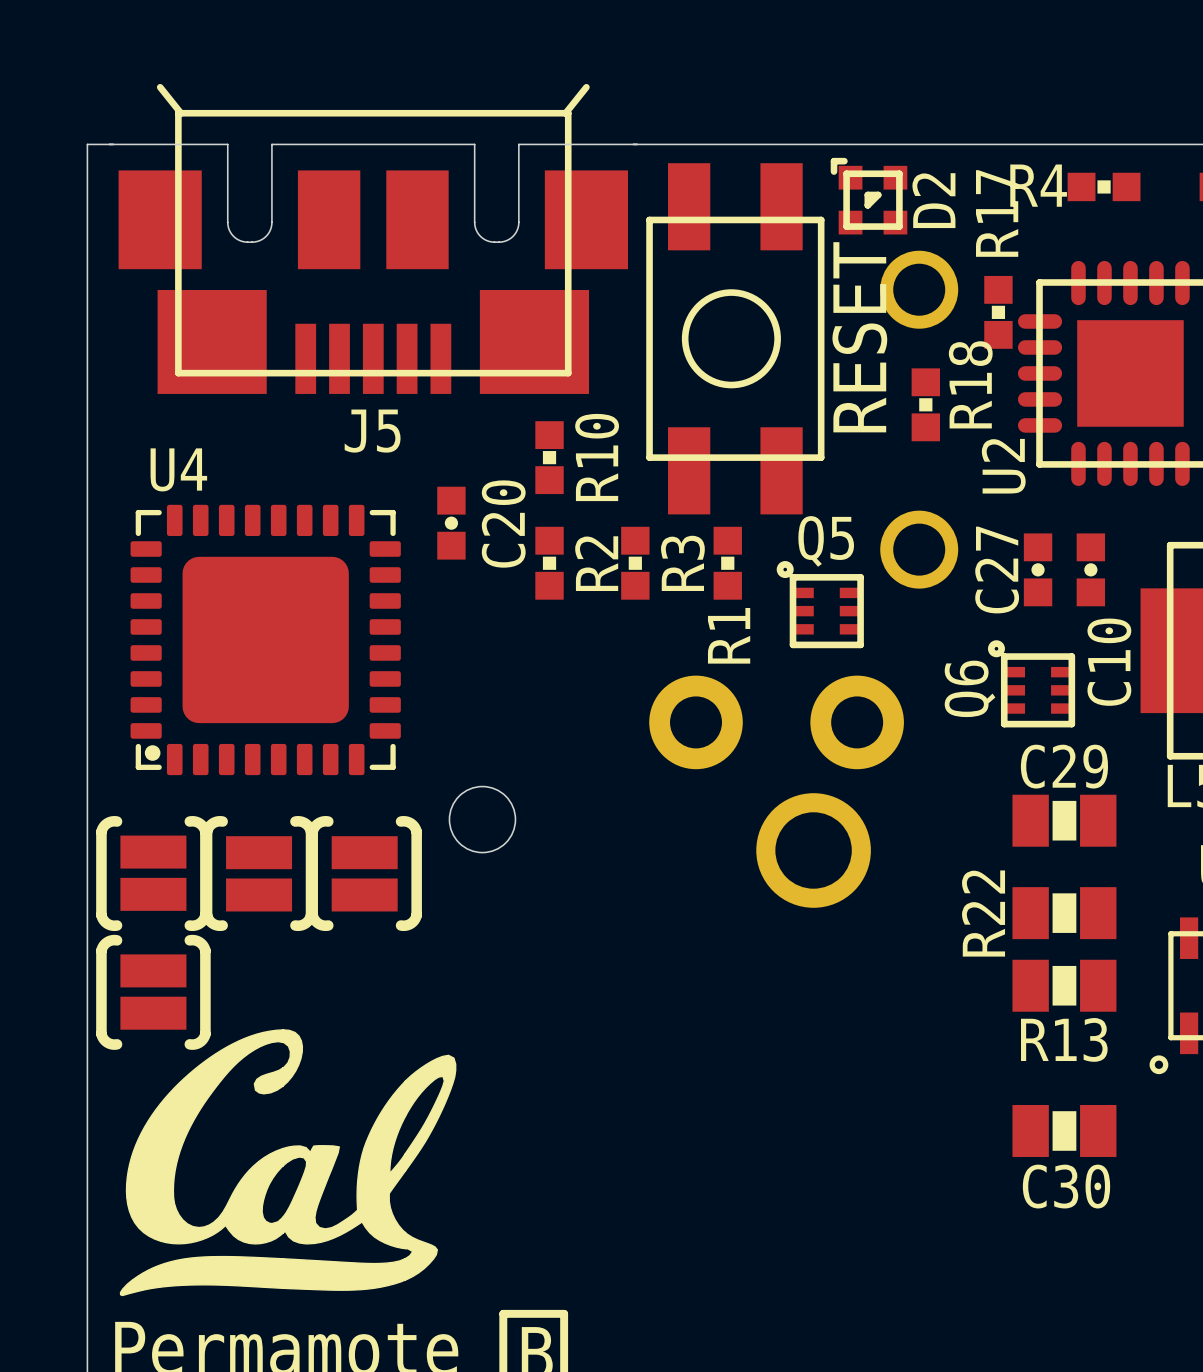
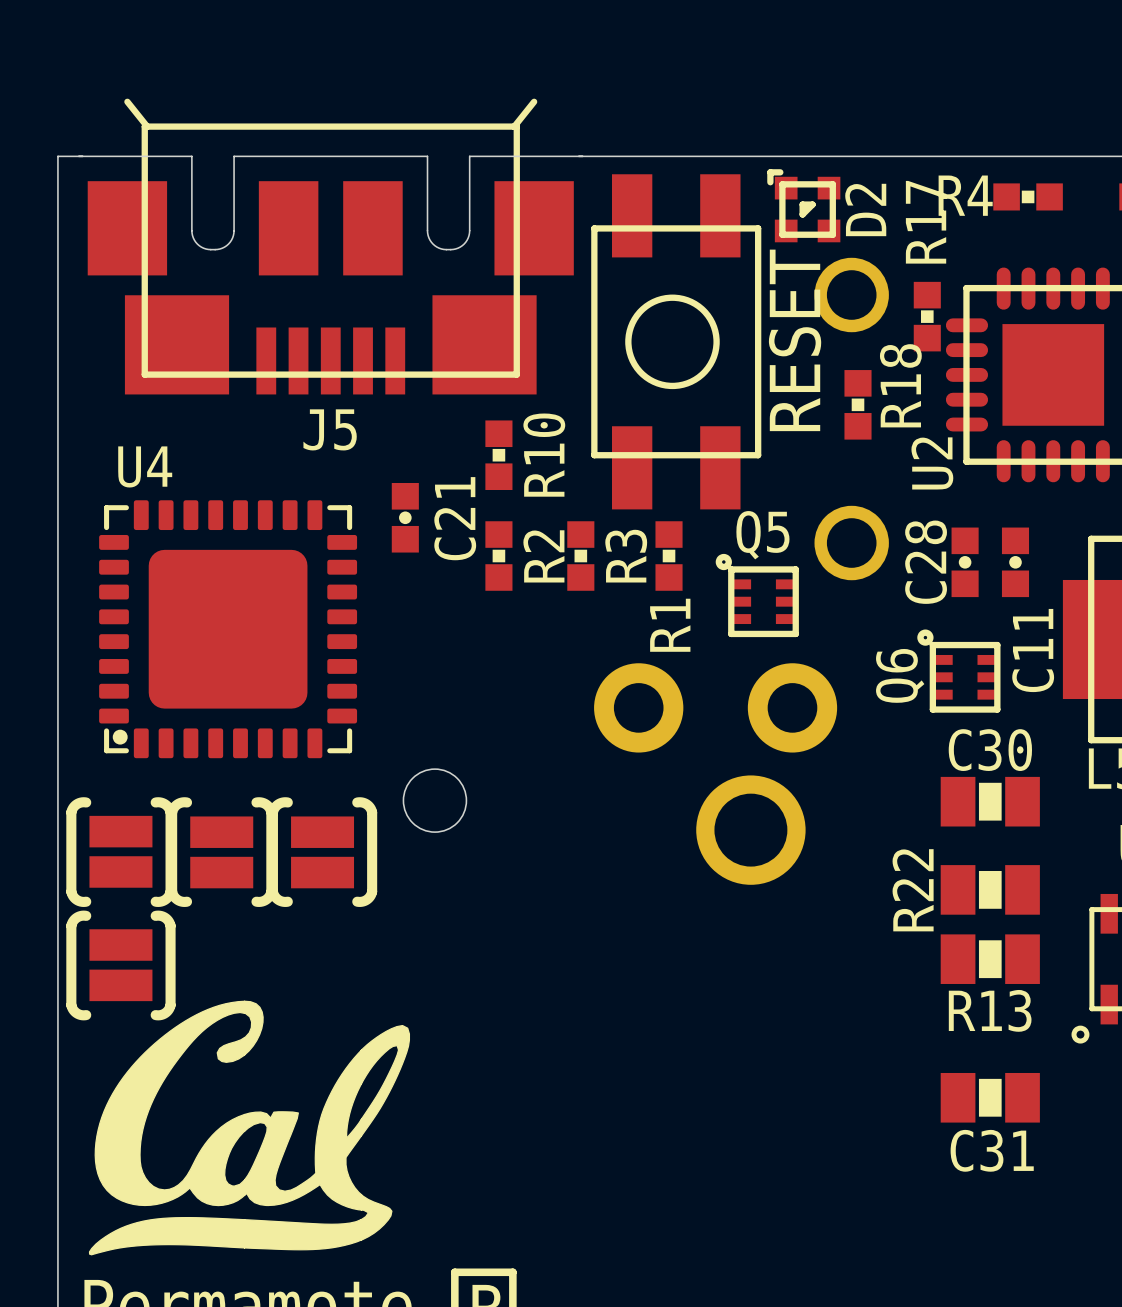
C20 name: C20 (503, 524) -> C21 (455, 518)
C27 name: C27 (997, 570) -> C28 (926, 562)
C10 name: C10 (1109, 662) -> C11 (1033, 650)
C29 name: C29 (1064, 766) -> C30 (990, 750)
C30 name: C30 (1066, 1186) -> C31 (992, 1150)

